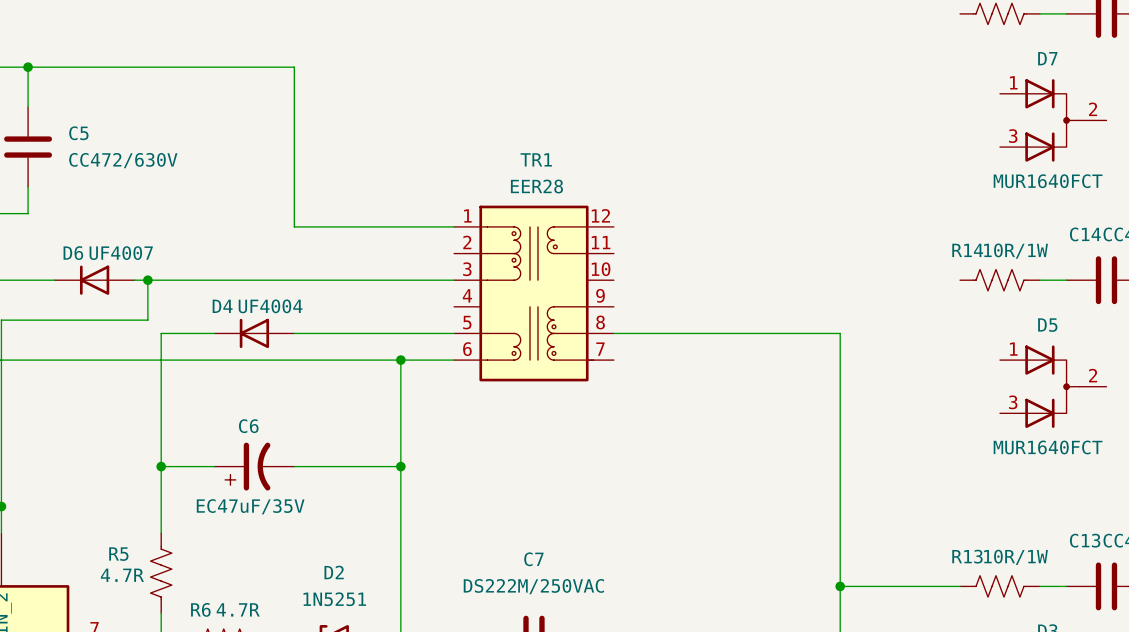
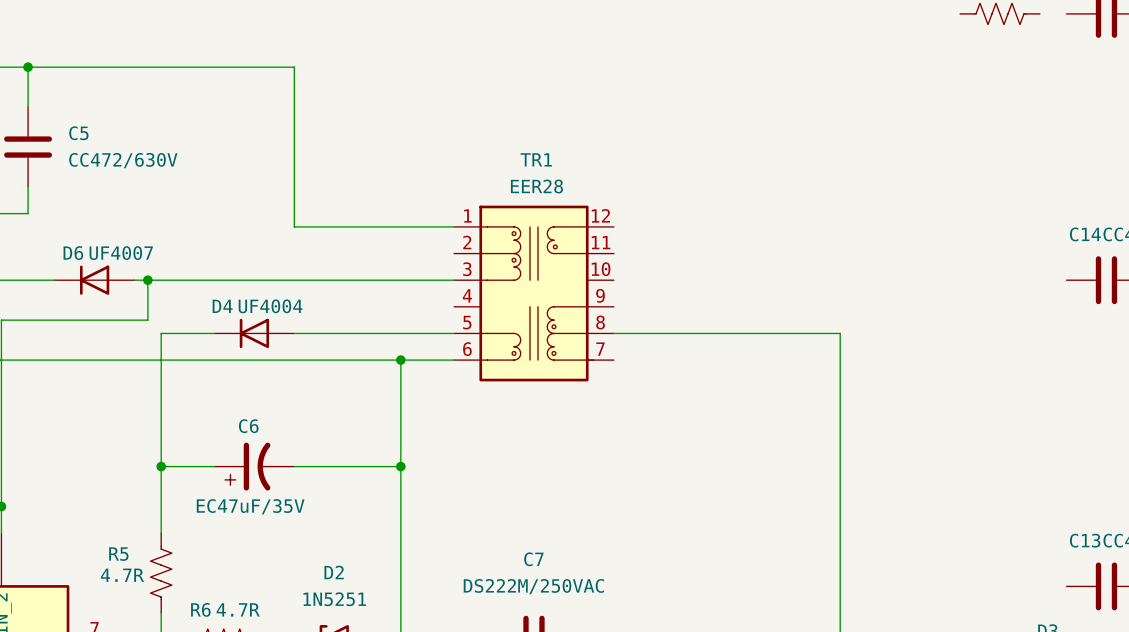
wire: (1039, 13) (1066, 13) -> none
D7: MUR1640FCT (1053, 120) -> none
R14: 10R/1W (999, 280) -> none
wire: (1039, 280) (1066, 280) -> none
D5: MUR1640FCT (1053, 386) -> none
wire: (840, 586) (960, 586) -> none
junction: (840, 586) -> none
R13: 10R/1W (999, 586) -> none
wire: (1039, 586) (1066, 586) -> none

